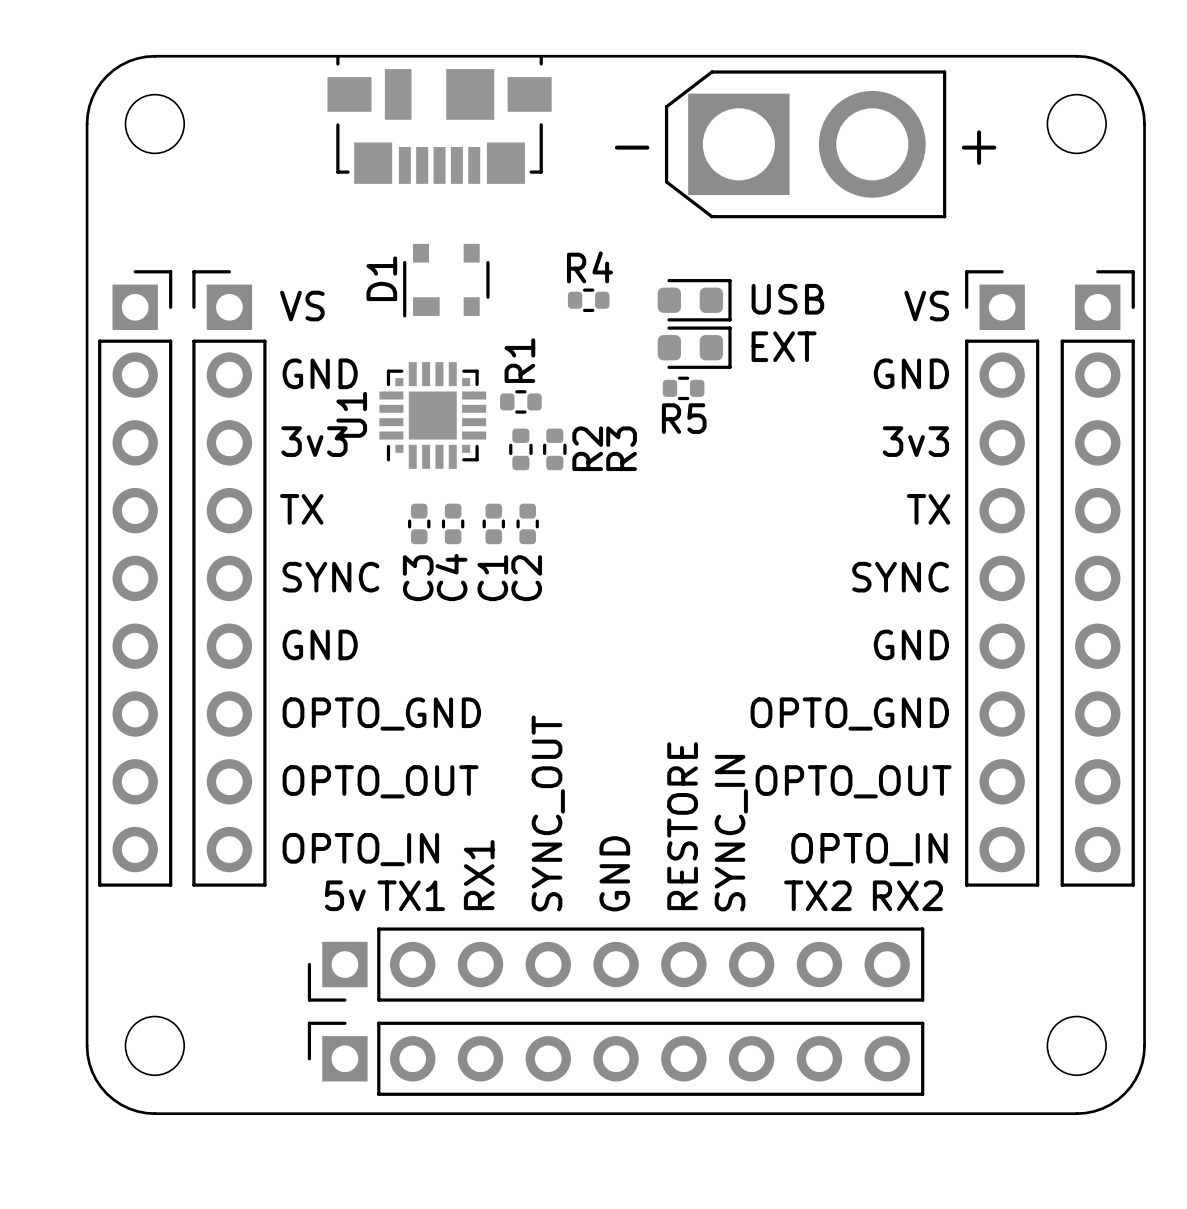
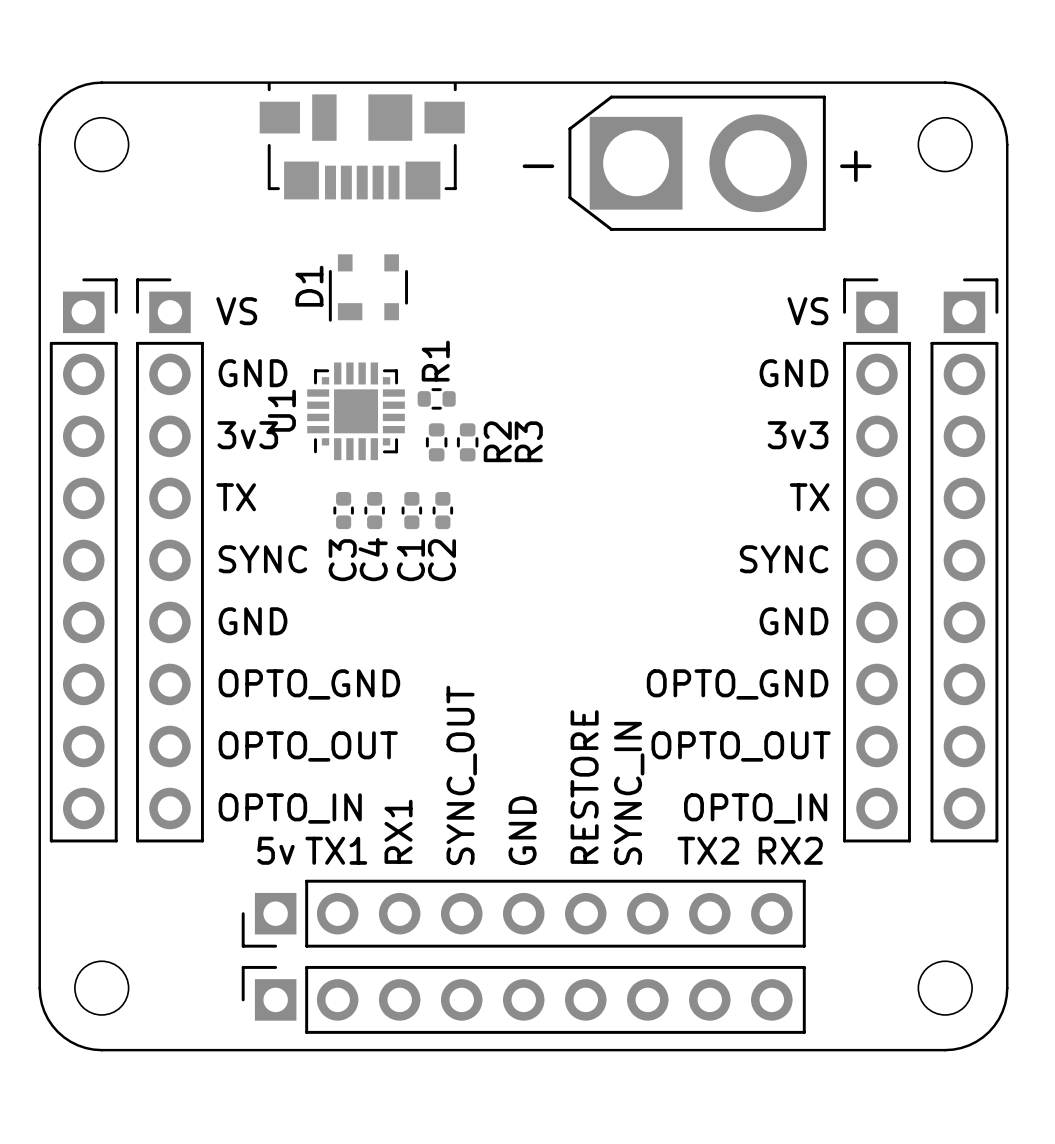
text: USB (787, 299) -> none
R4: (588, 300) -> none
part: (694, 300) -> none
text: EXT (784, 346) -> none
part: (694, 347) -> none
R5: (683, 388) -> none

